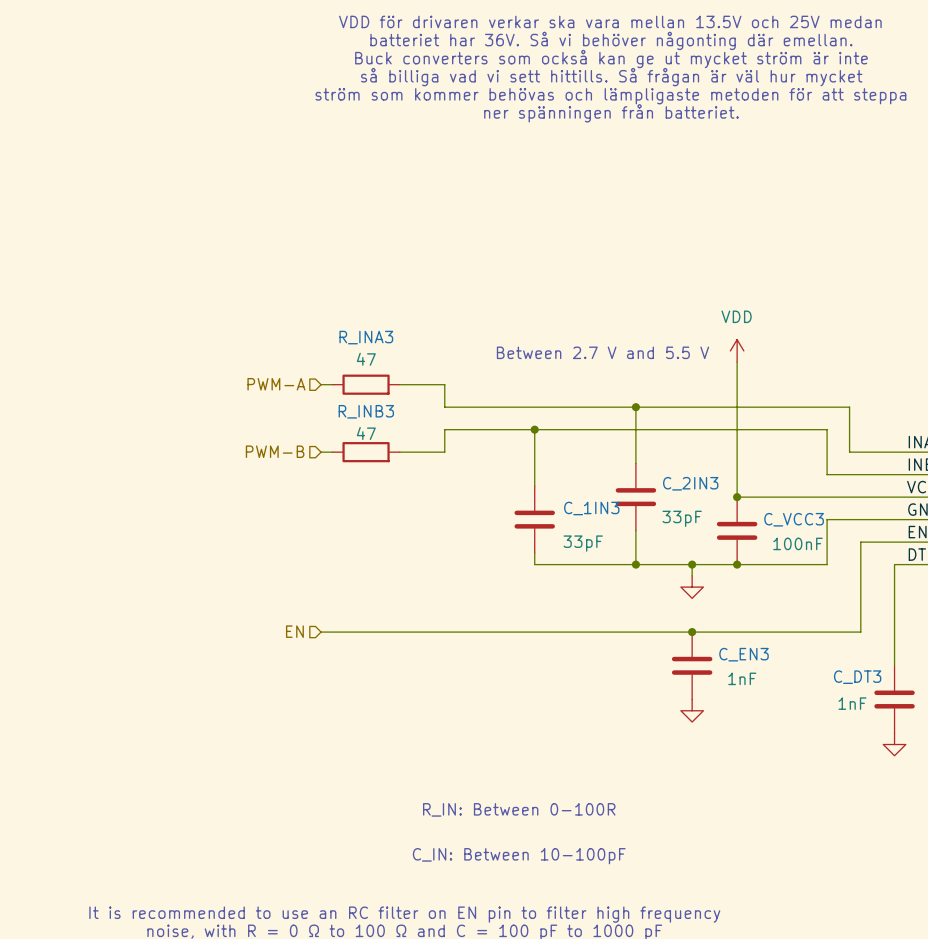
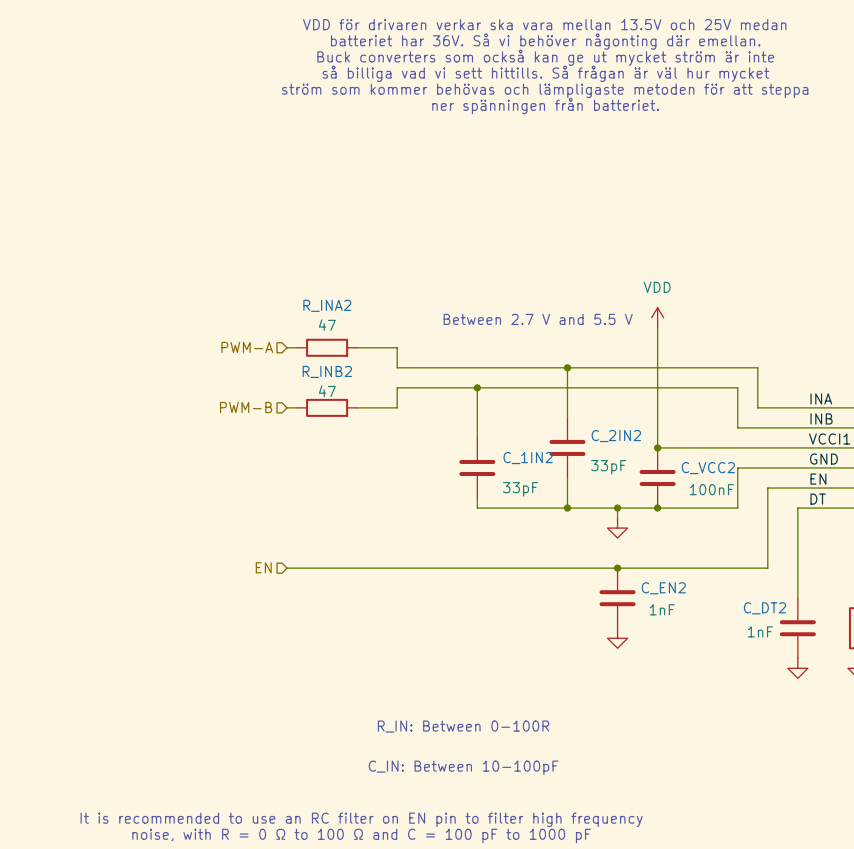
R_INA3 name: R_INA3 (366, 337) -> R_INA2 (327, 305)
R_INB3 name: R_INB3 (366, 411) -> R_INB2 (327, 371)
C_2IN3 name: C_2IN3 (690, 483) -> C_2IN2 (616, 436)
C_1IN3 name: C_1IN3 (591, 508) -> C_1IN2 (528, 458)
C_VCC3 name: C_VCC3 (794, 519) -> C_VCC2 (708, 468)
C_EN3 name: C_EN3 (744, 654) -> C_EN2 (663, 588)
C_DT3 name: C_DT3 (857, 677) -> C_DT2 (764, 608)

